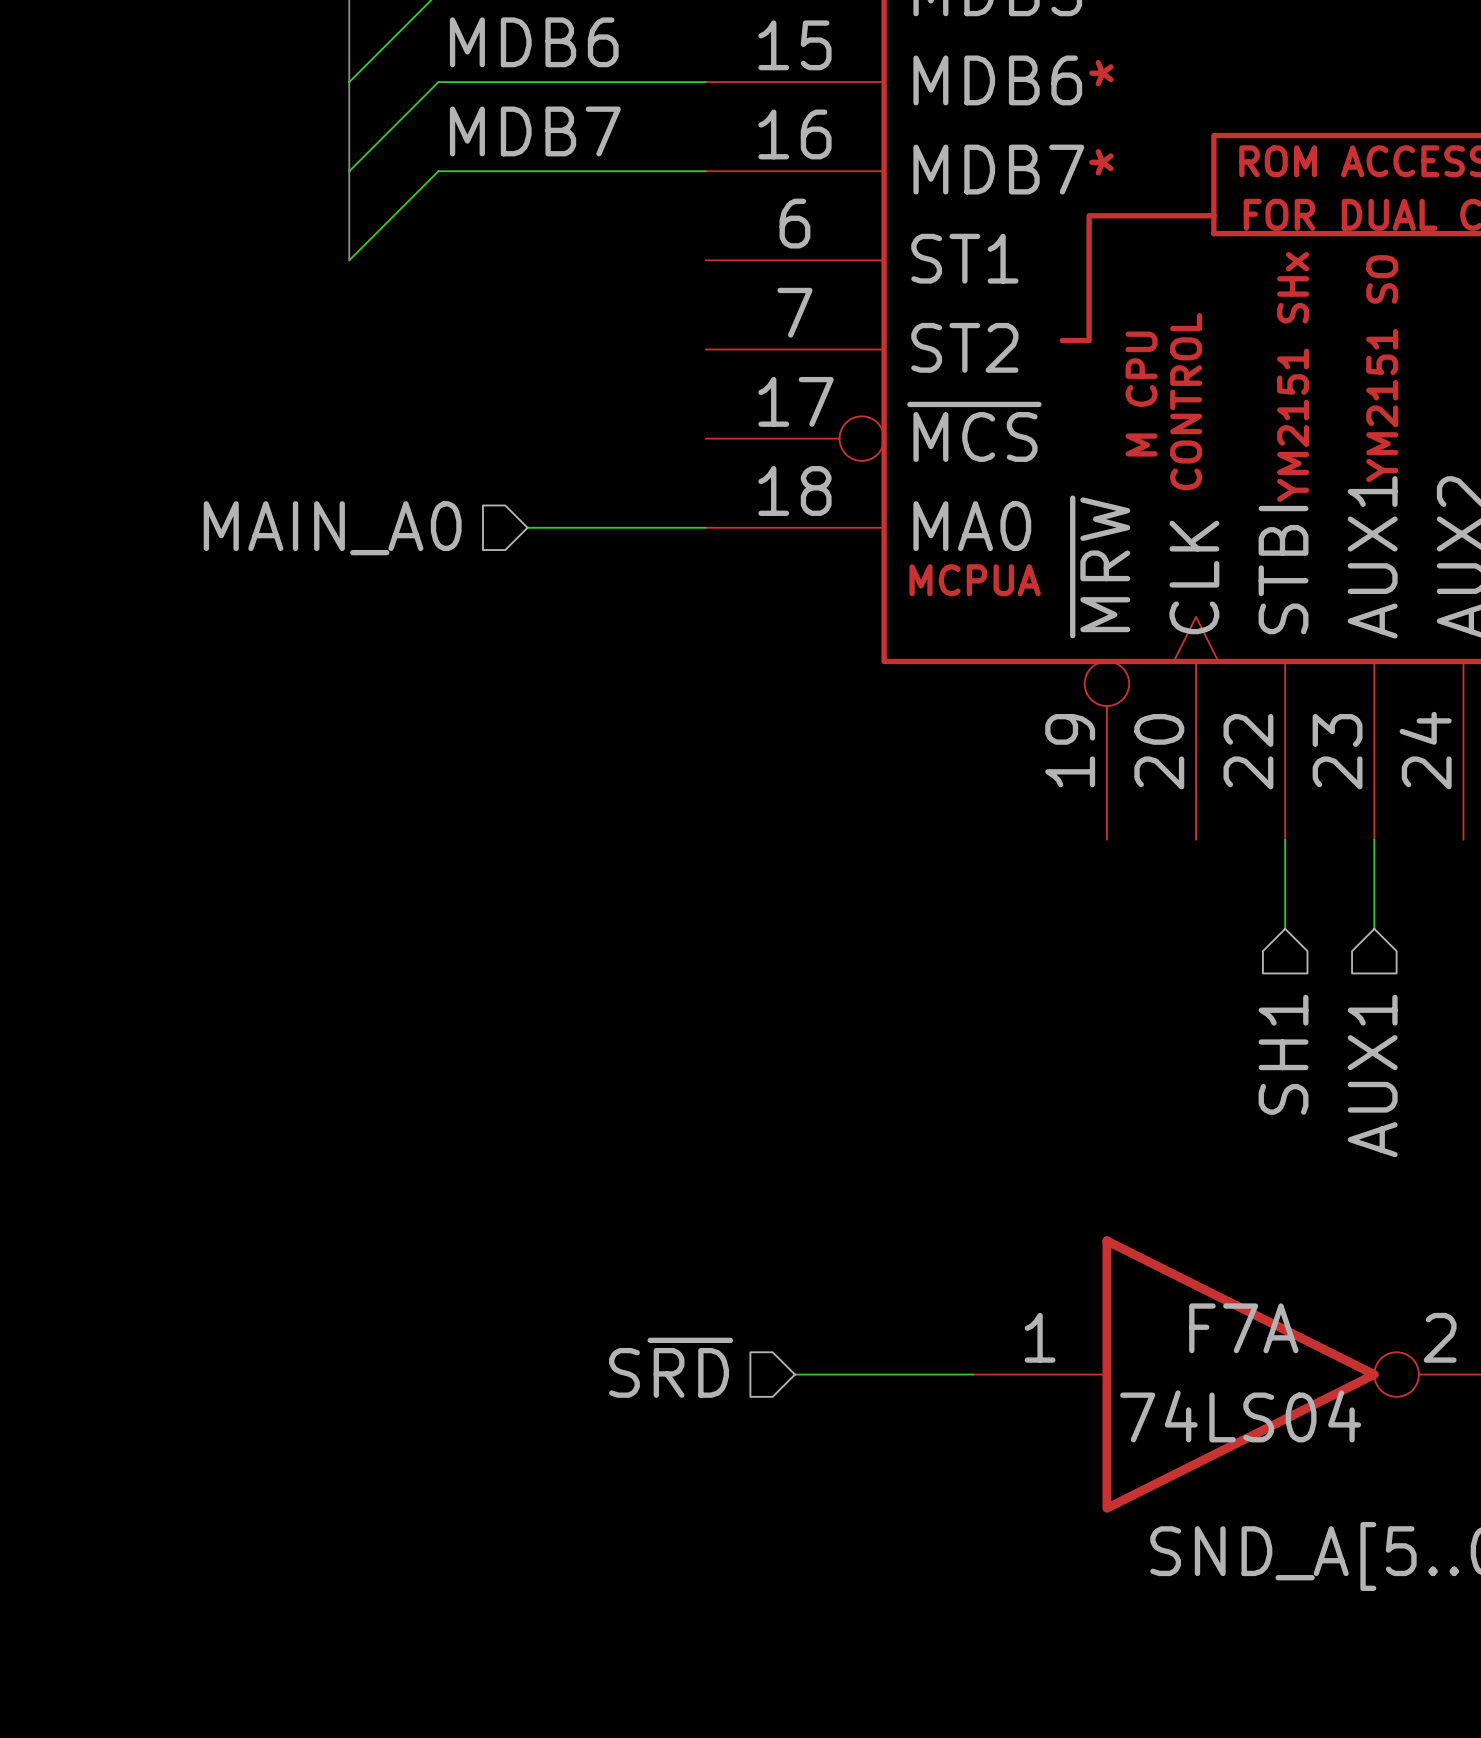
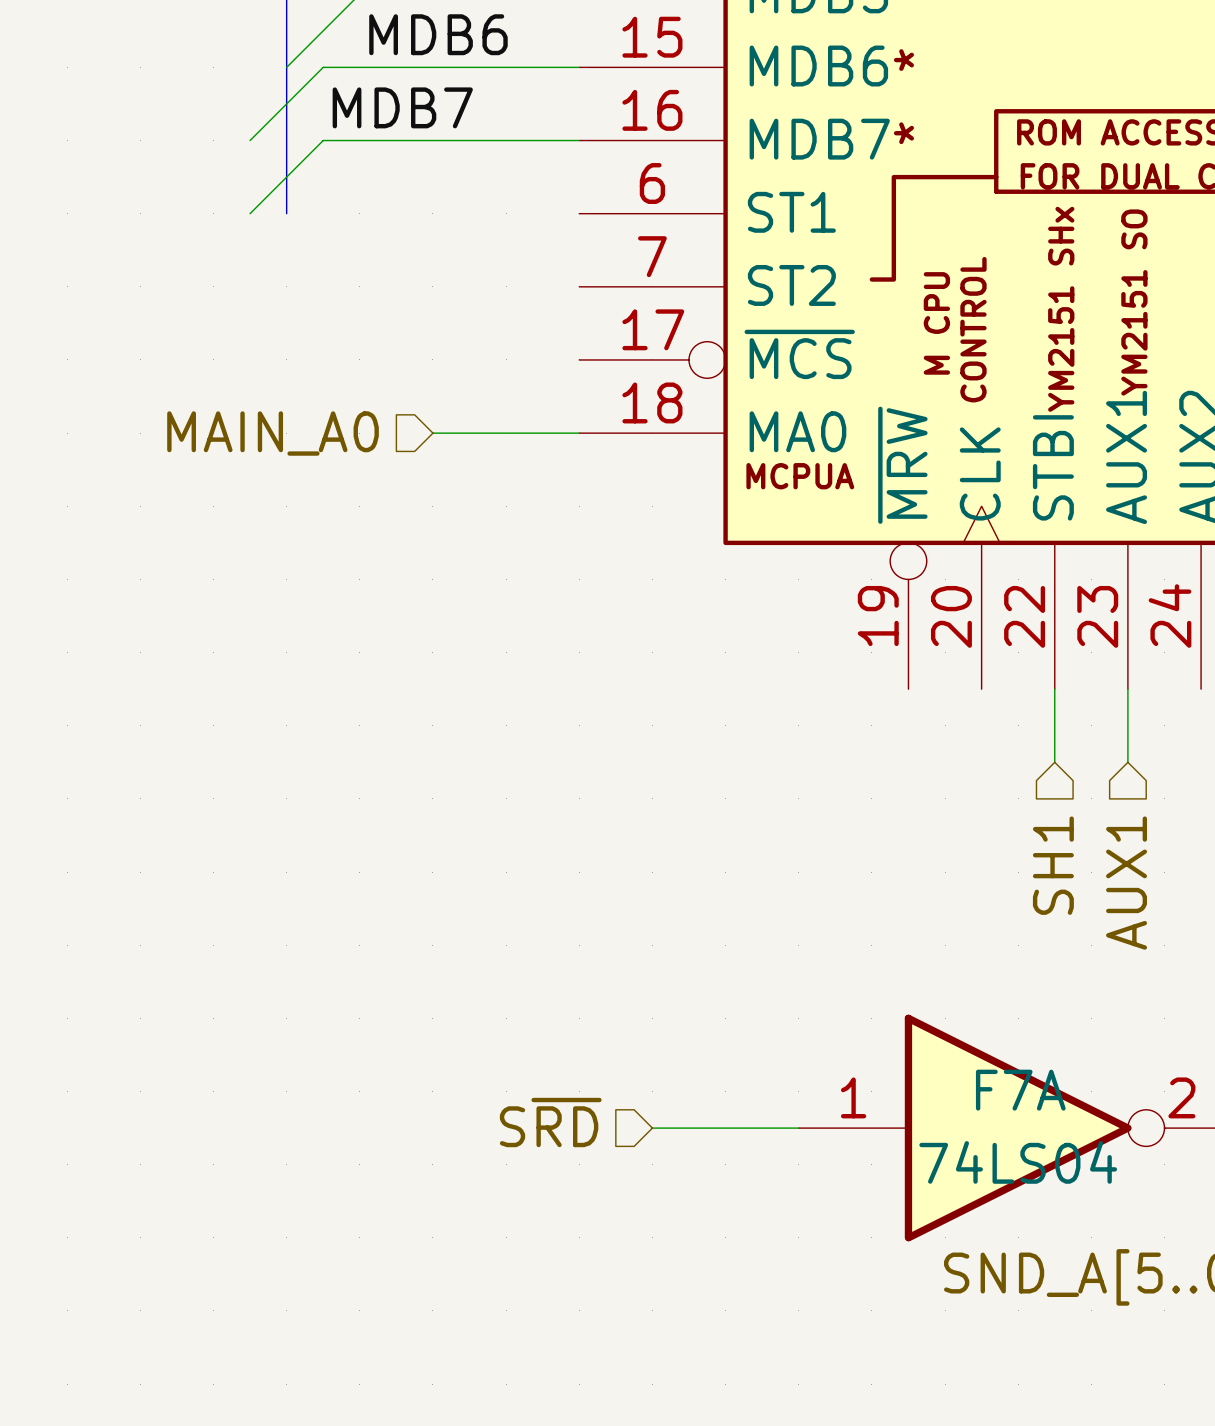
wire: (438, 82) (349, 171) -> (359, 67) (323, 67) (250, 140)
label position: MDB7 (535, 131) -> MDB7 (402, 107)
wire: (438, 171) (349, 260) -> (359, 140) (323, 140) (250, 213)

